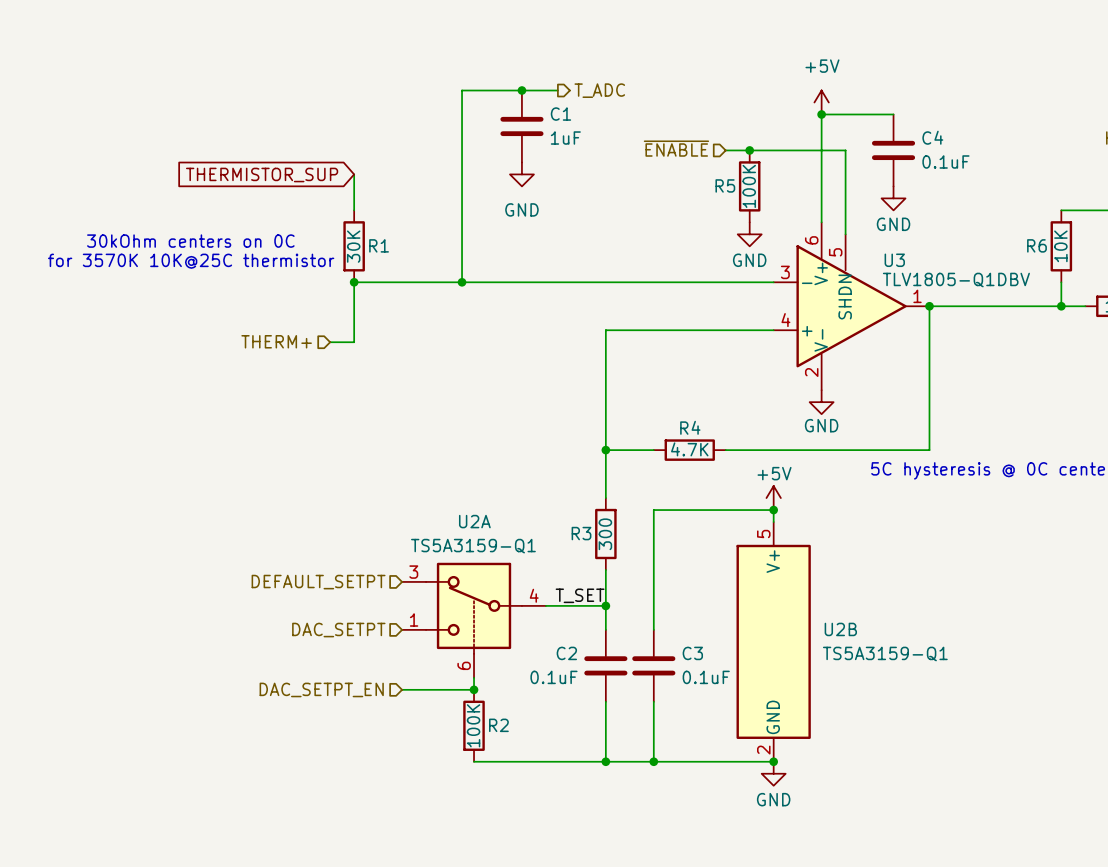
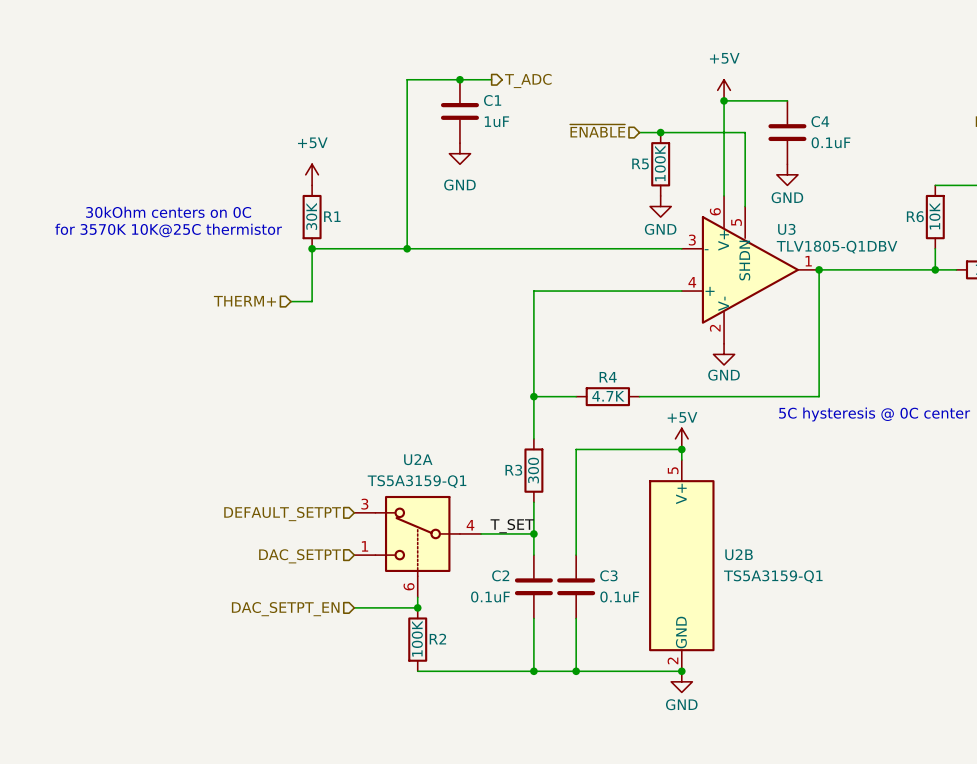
global label: THERMISTOR_SUP (262, 174) -> none
power symbol: none -> +5V (312, 174)

